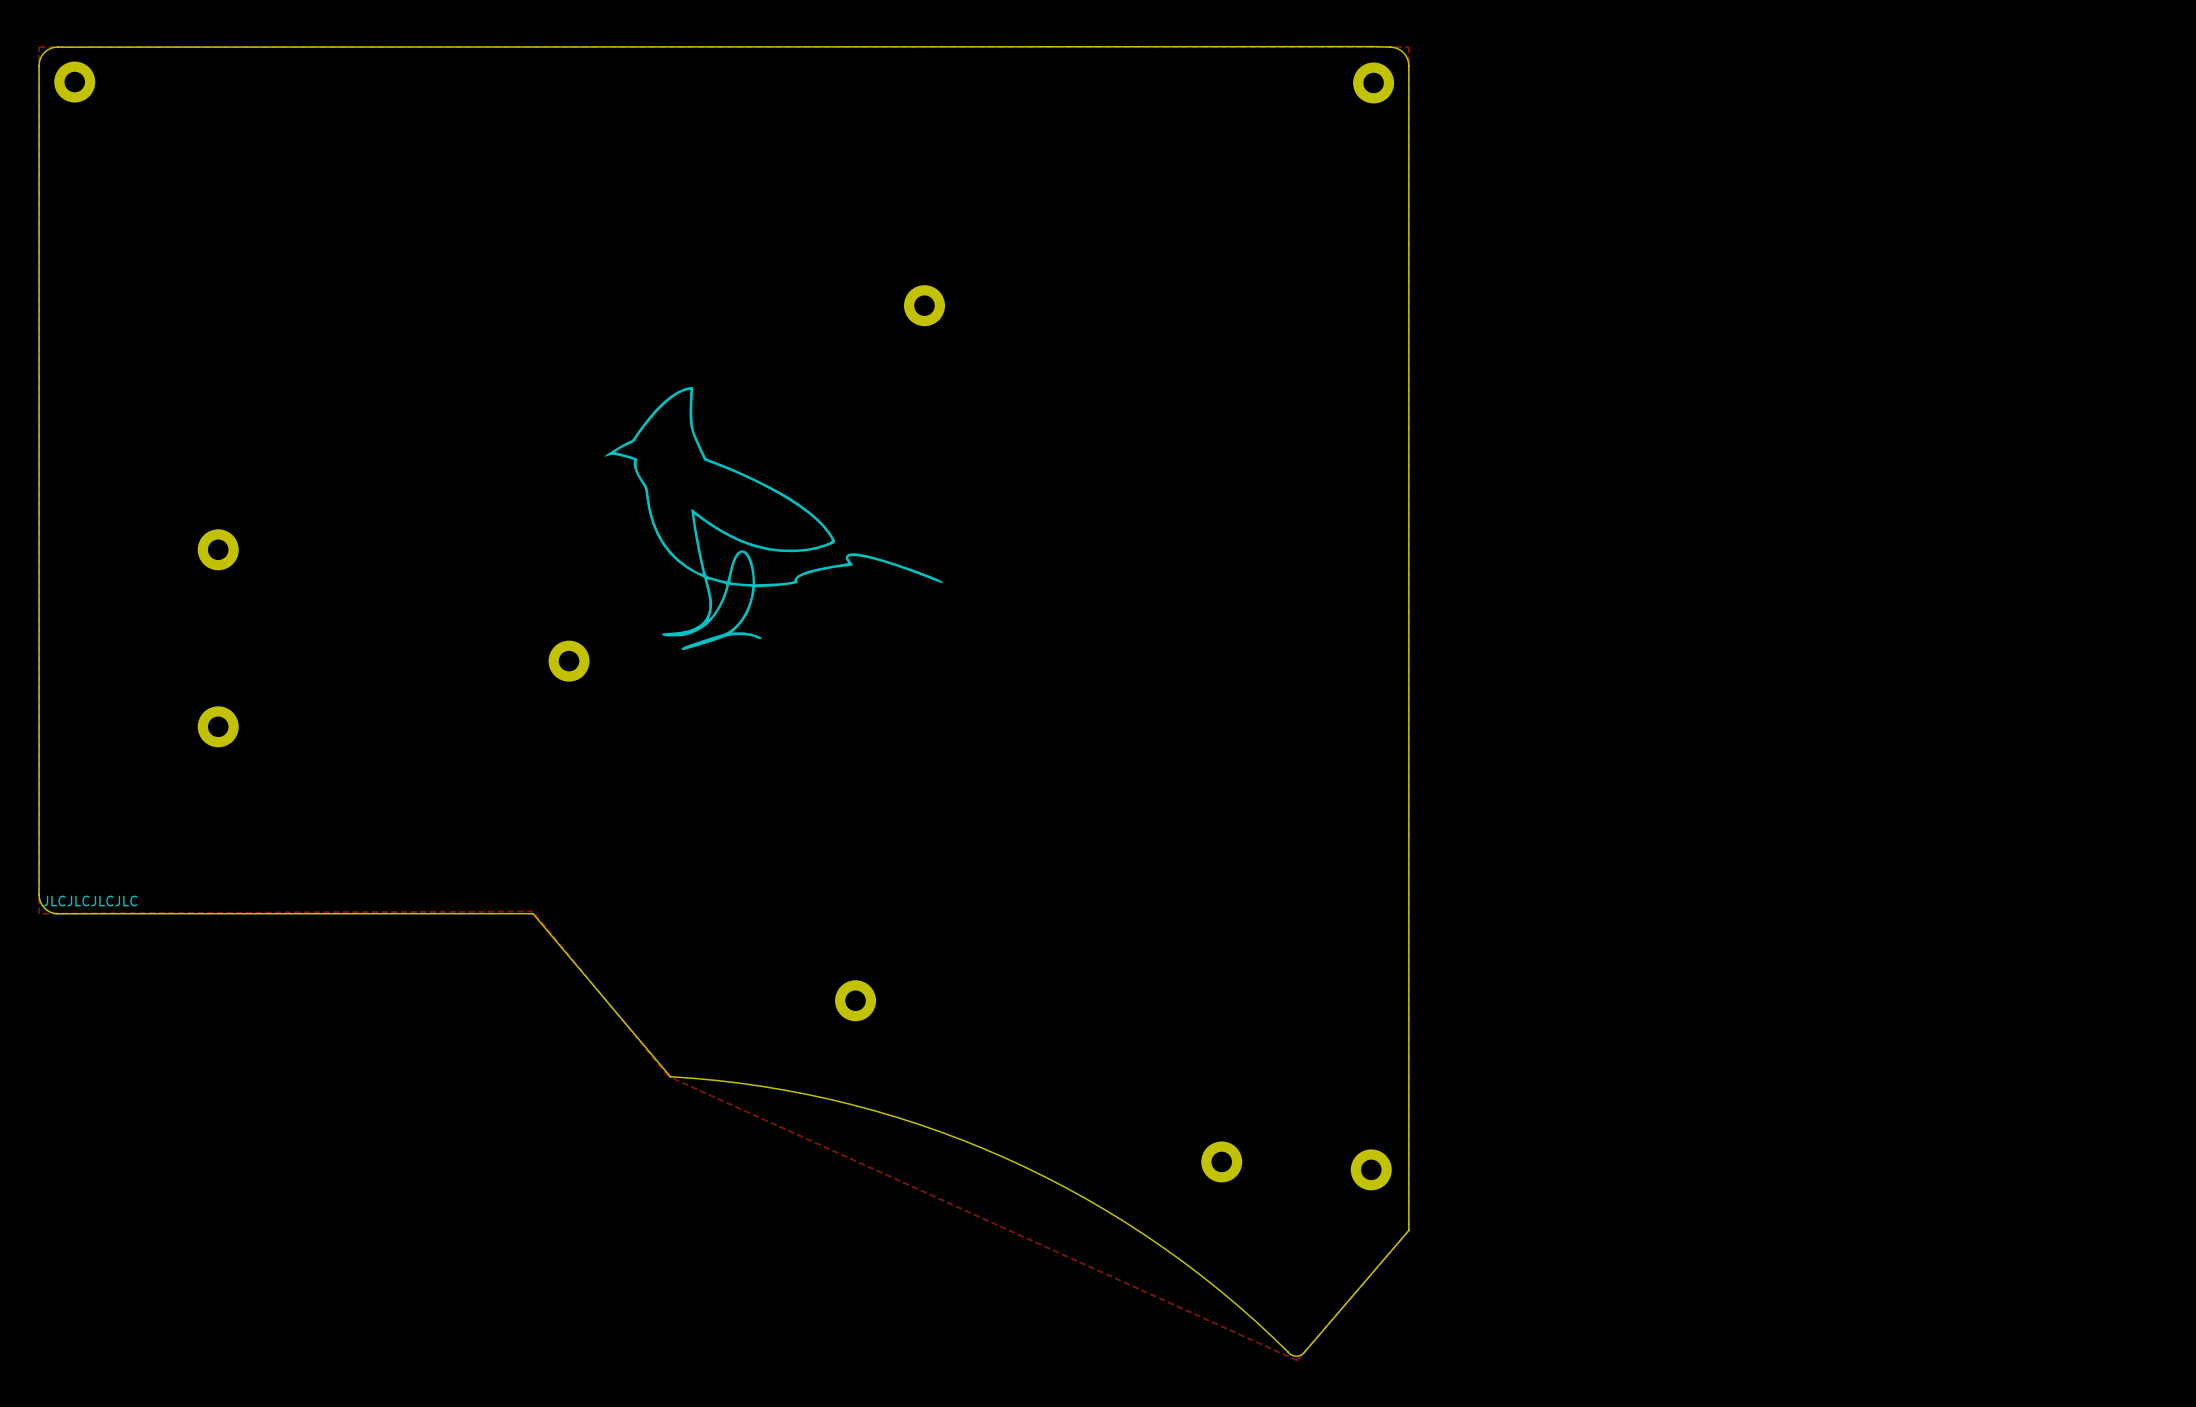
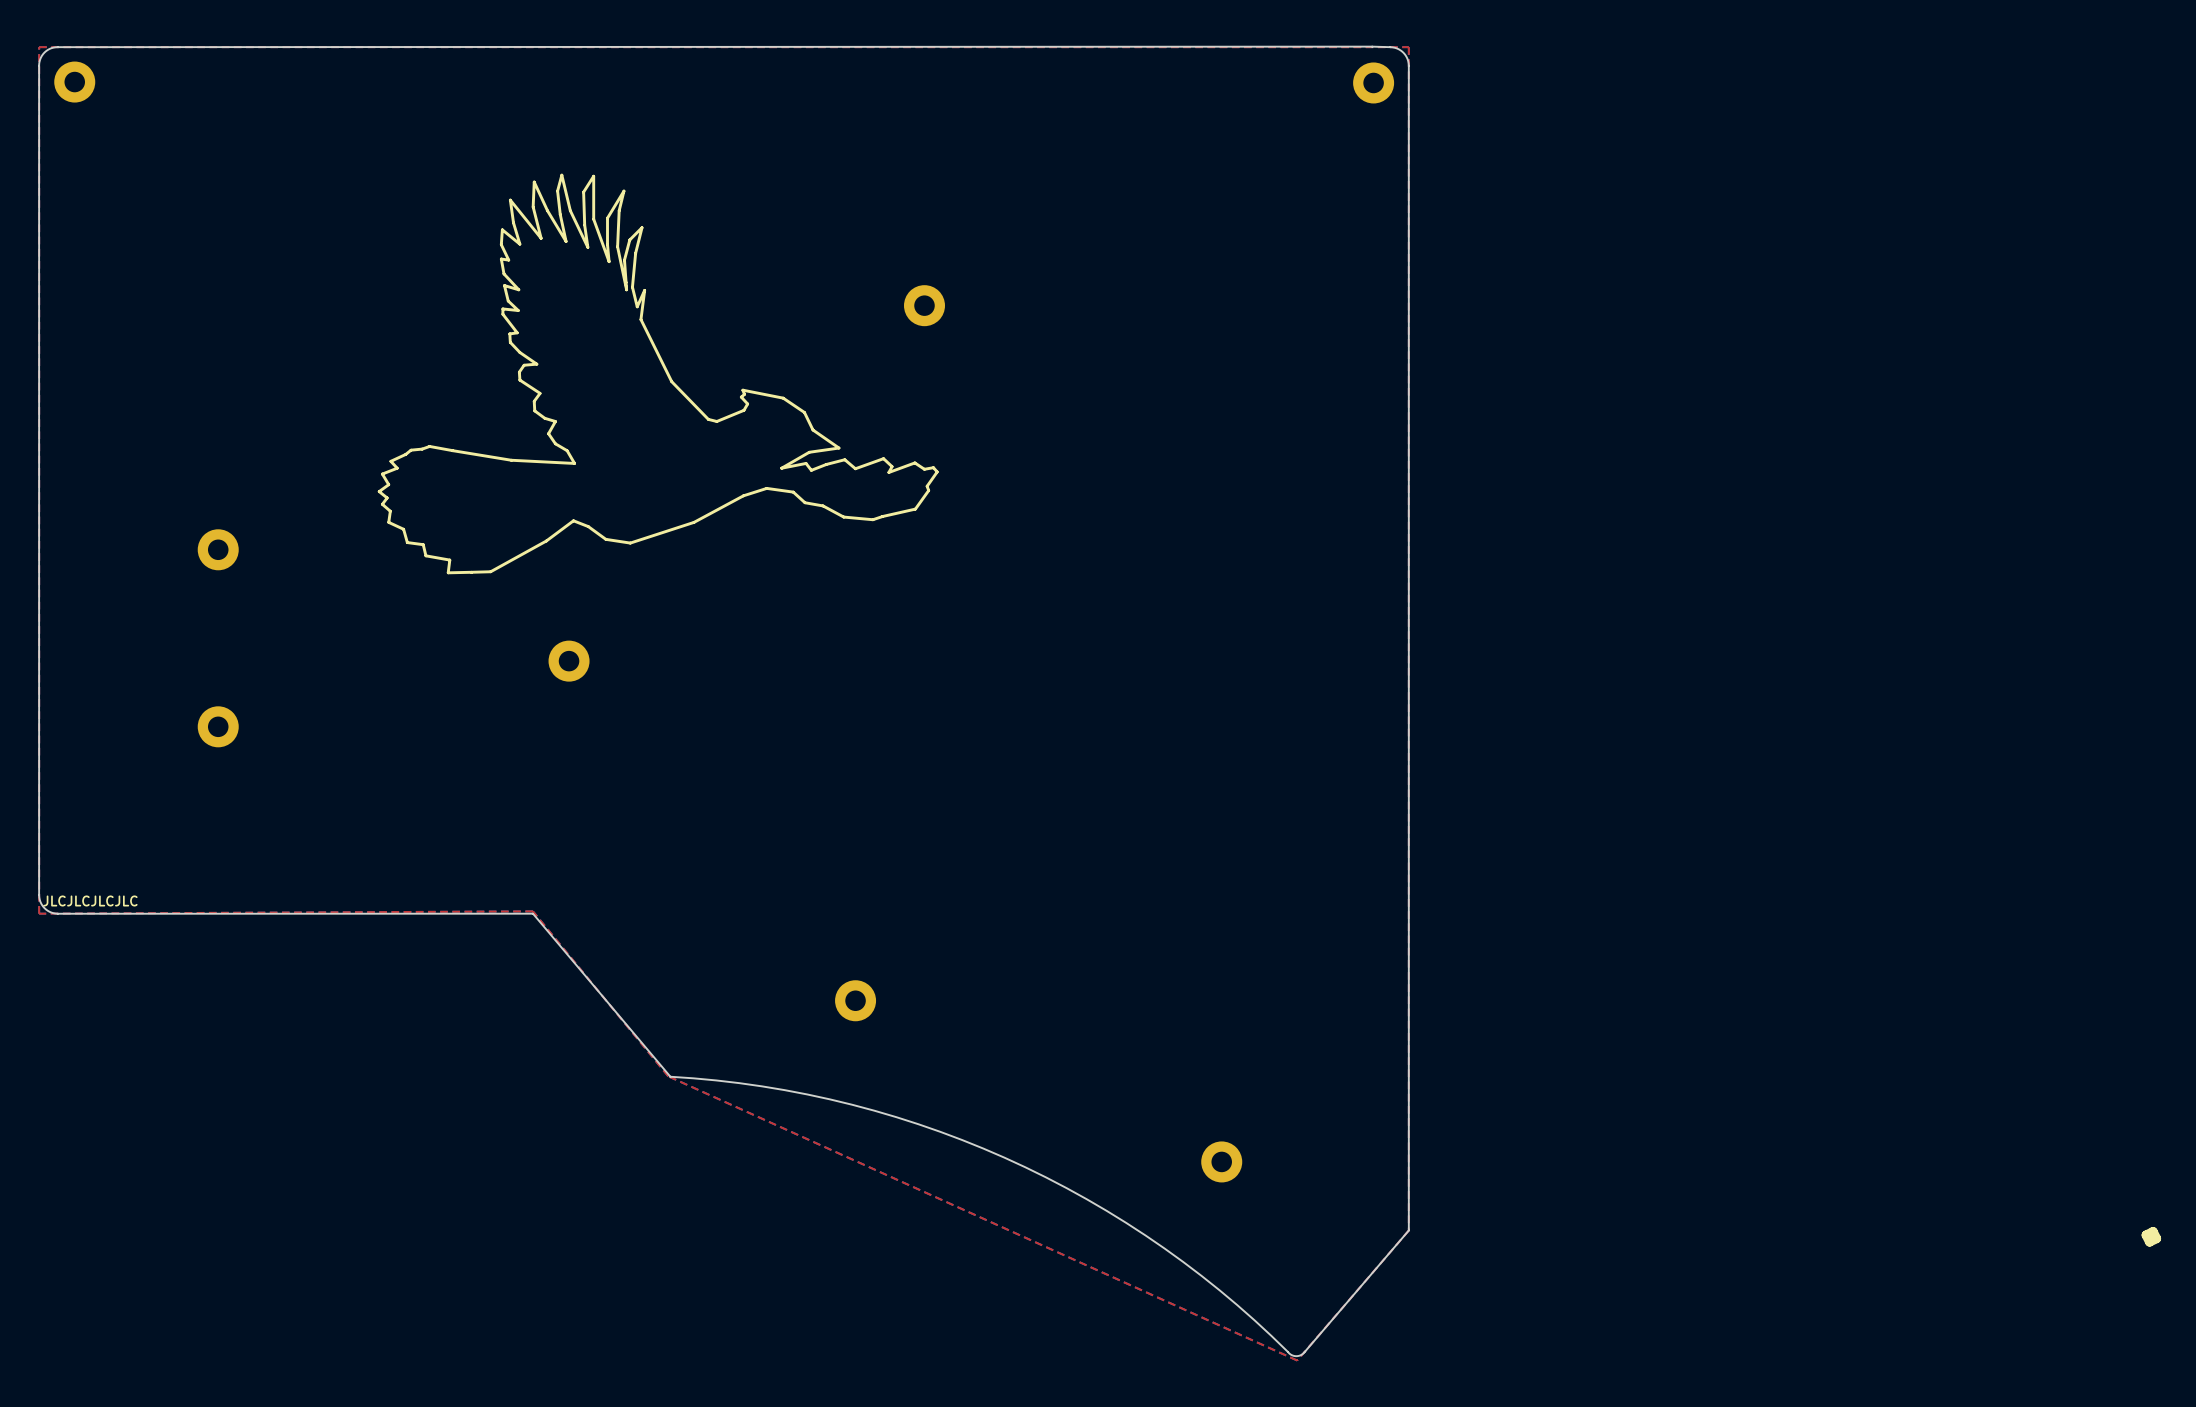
drawing: none -> [377, 173, 2162, 1247]
drawing: [604, 386, 943, 651] -> none
part: (1371, 1169) -> none

